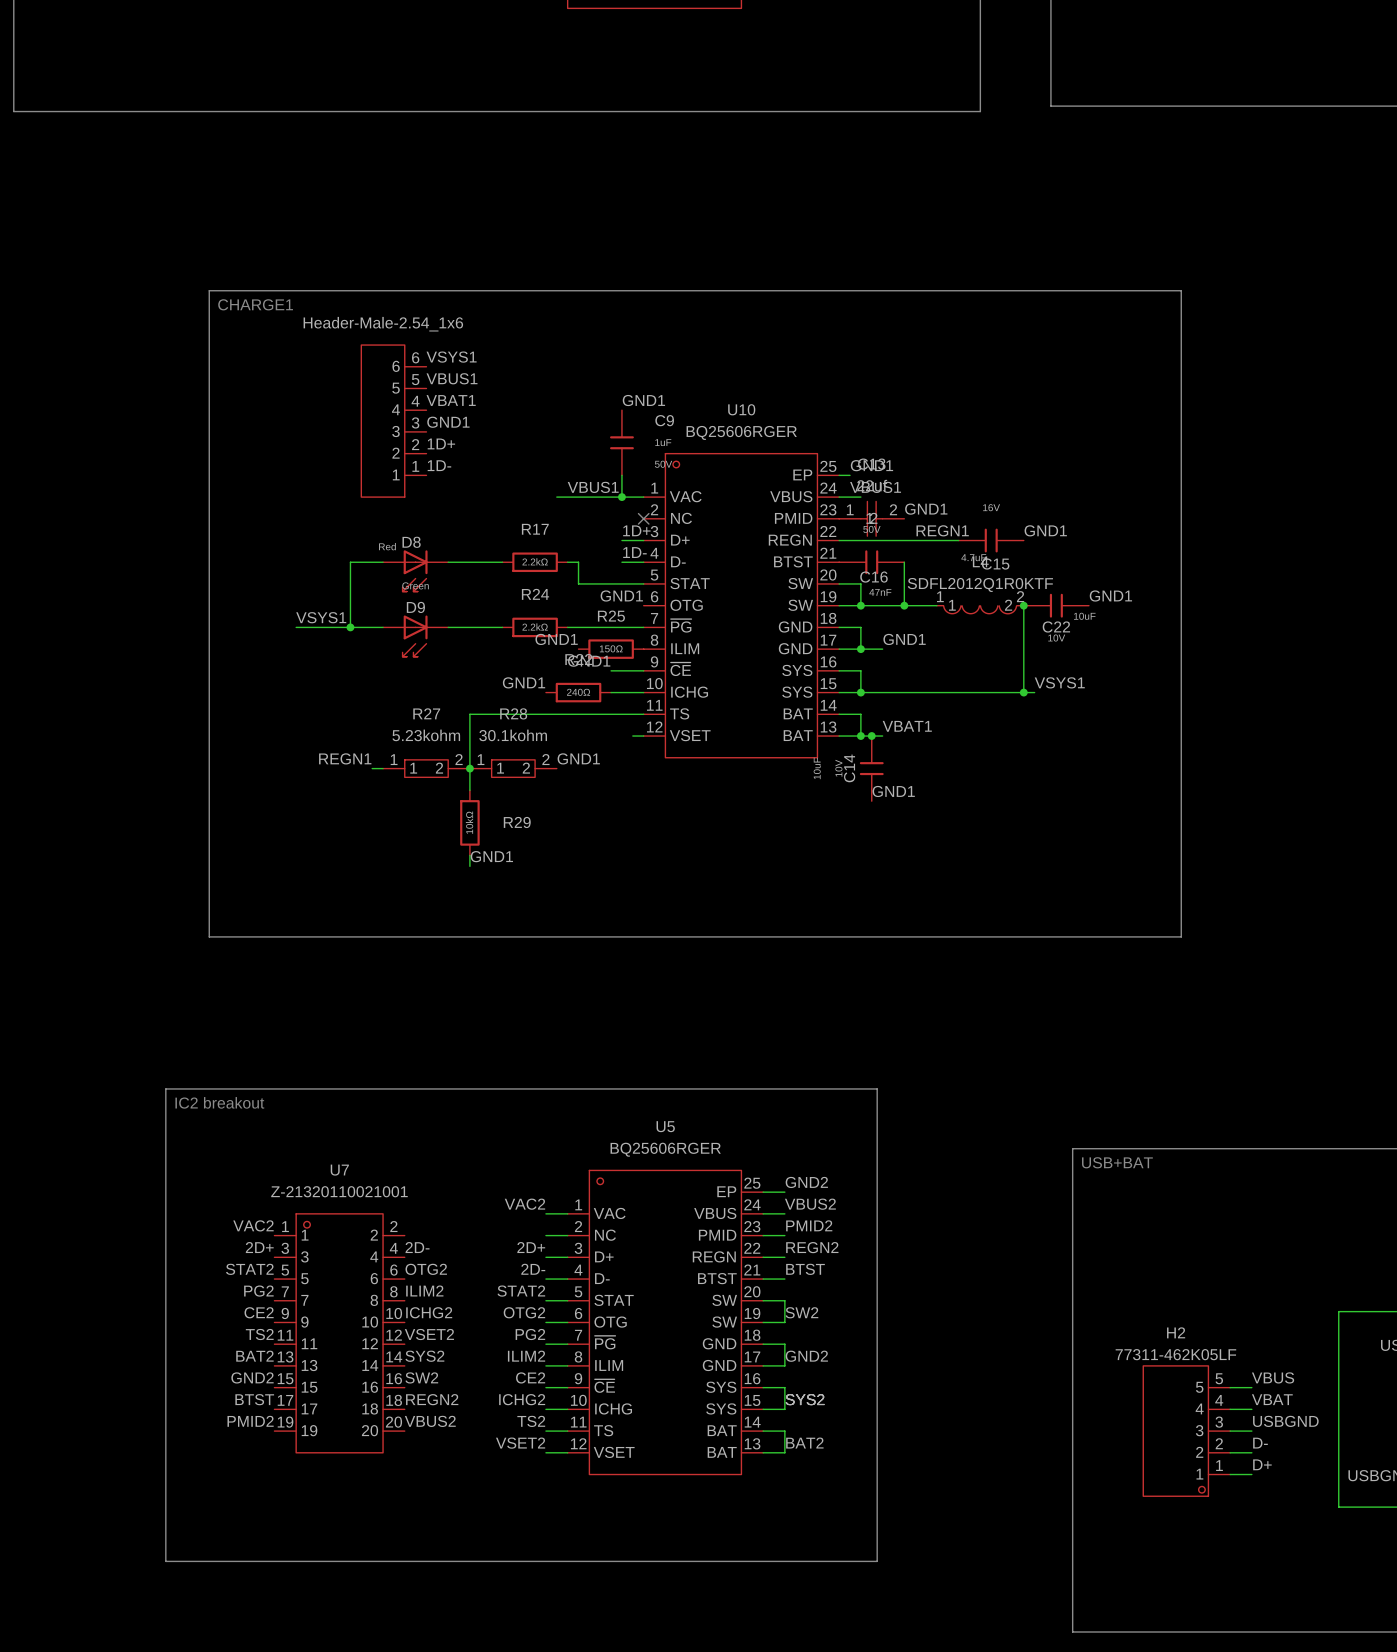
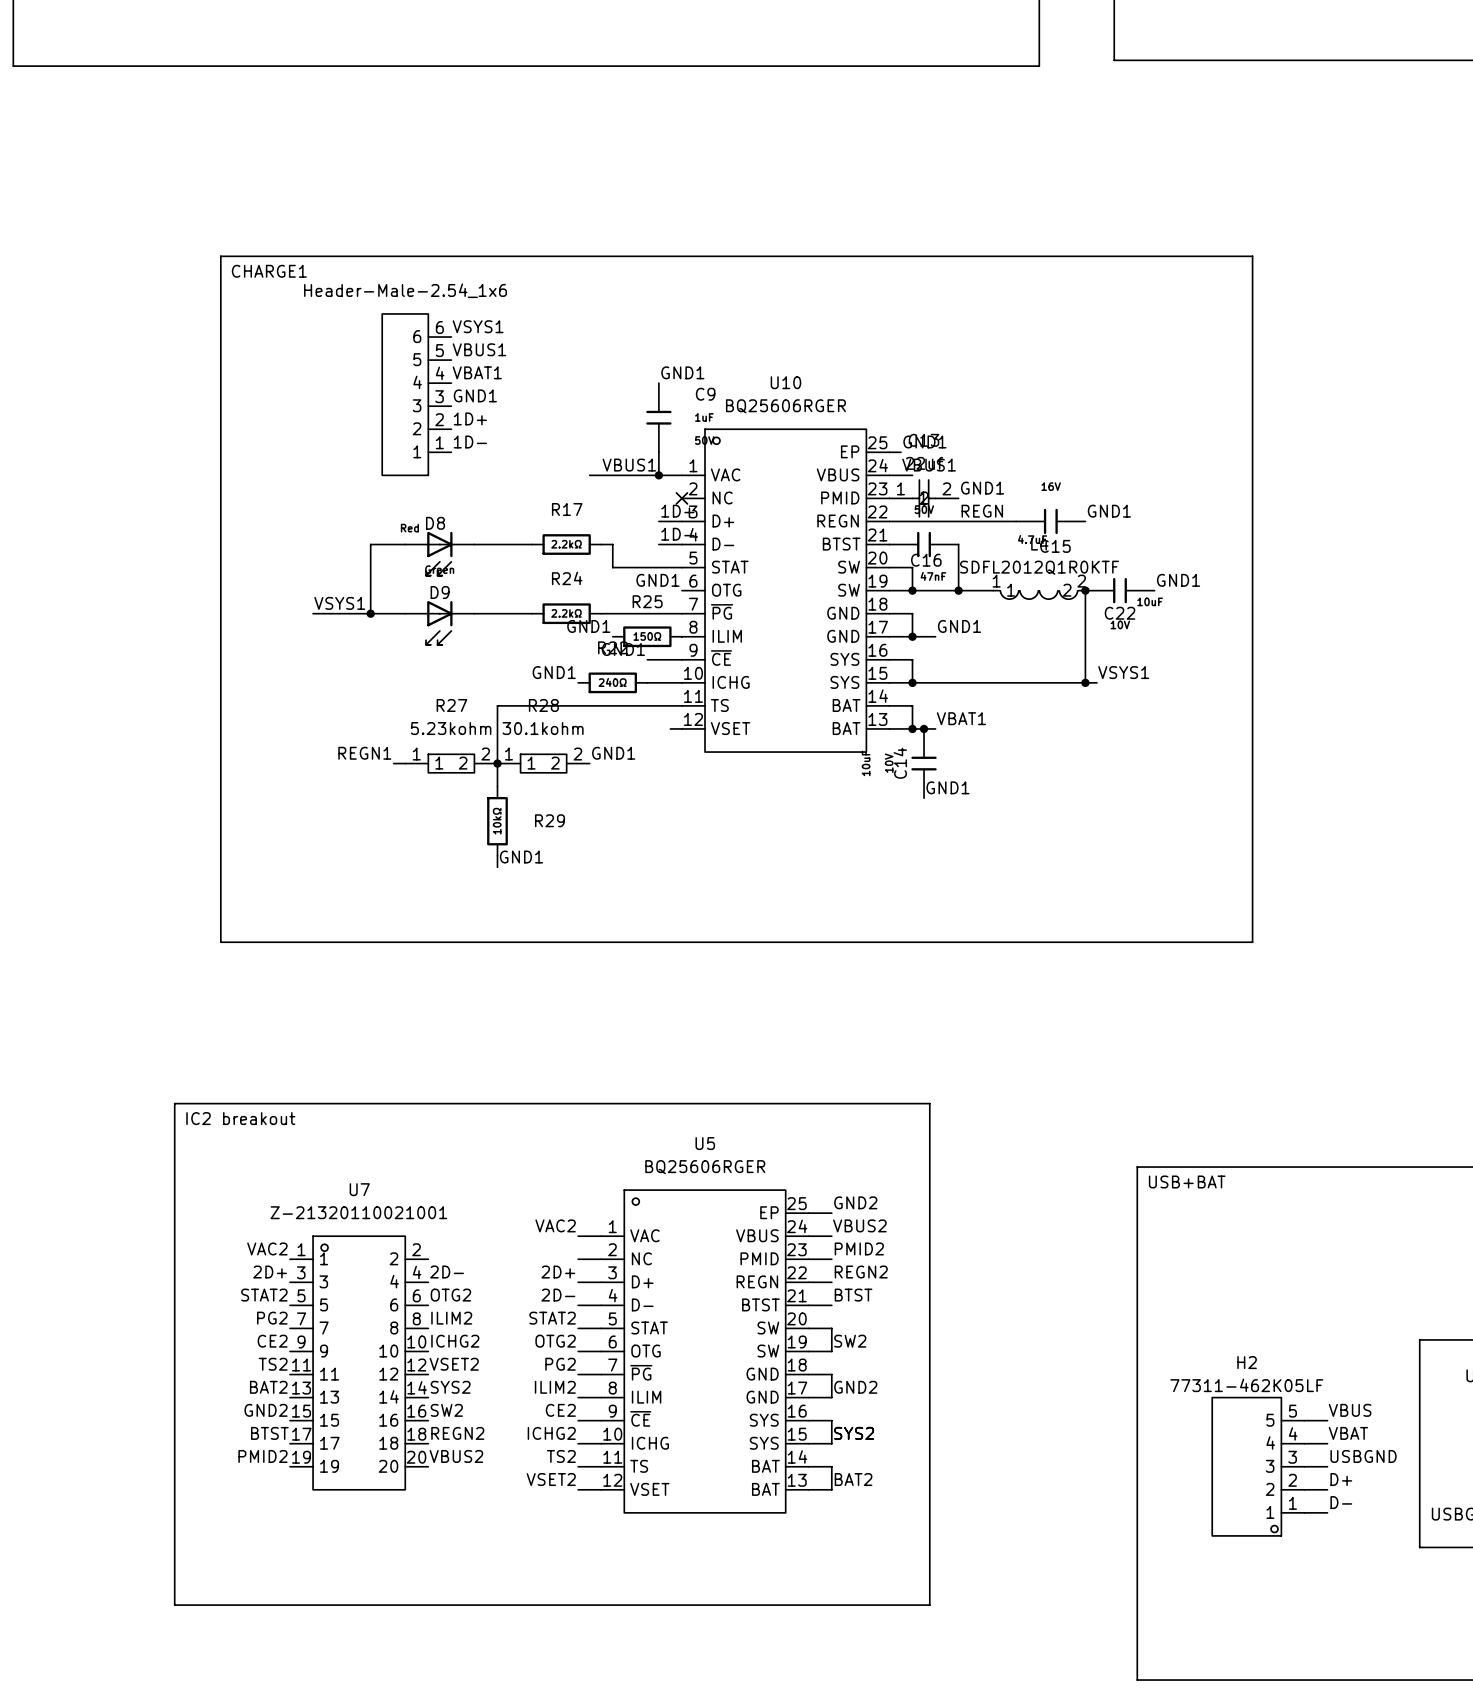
label: REGN1 (942, 530) -> REGN (982, 511)
label: D- (1260, 1443) -> D+ (1341, 1479)
label: D+ (1262, 1464) -> D- (1341, 1502)

